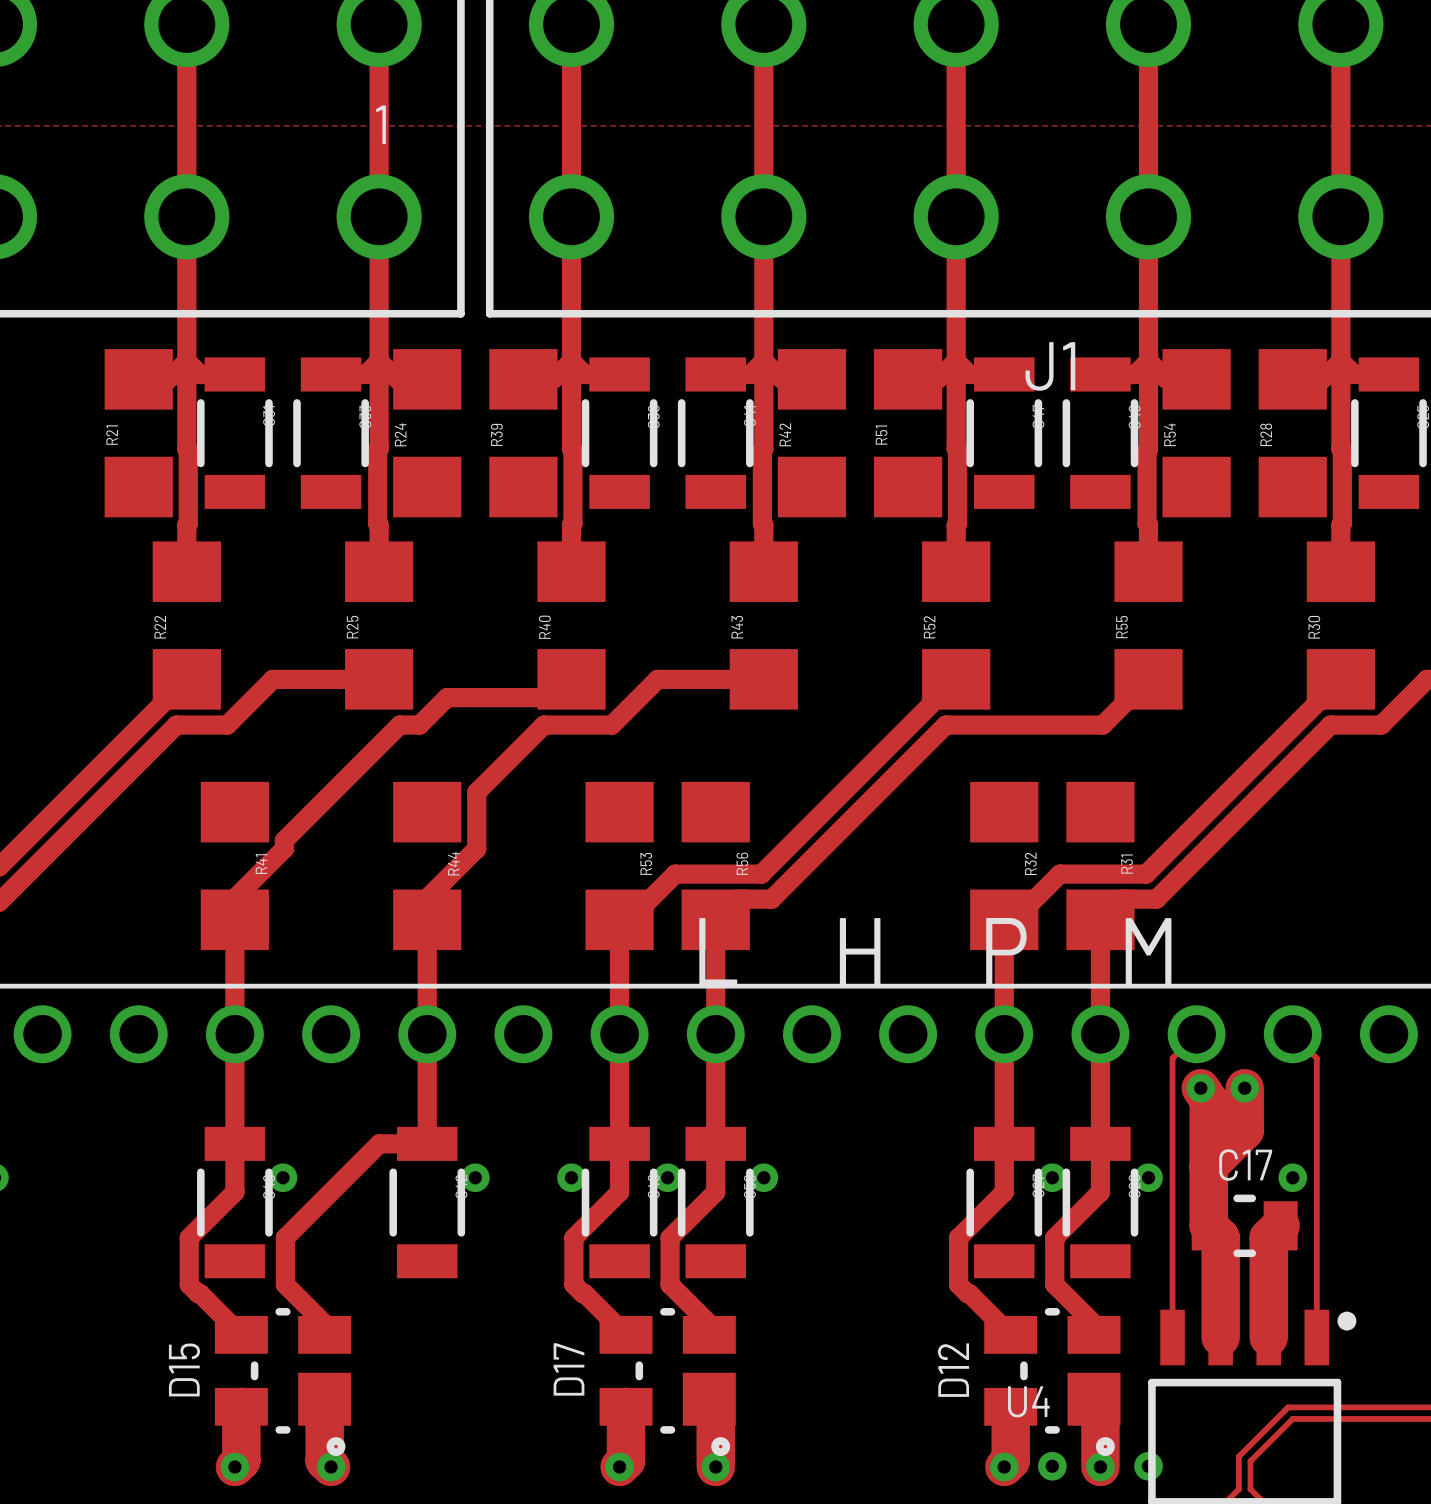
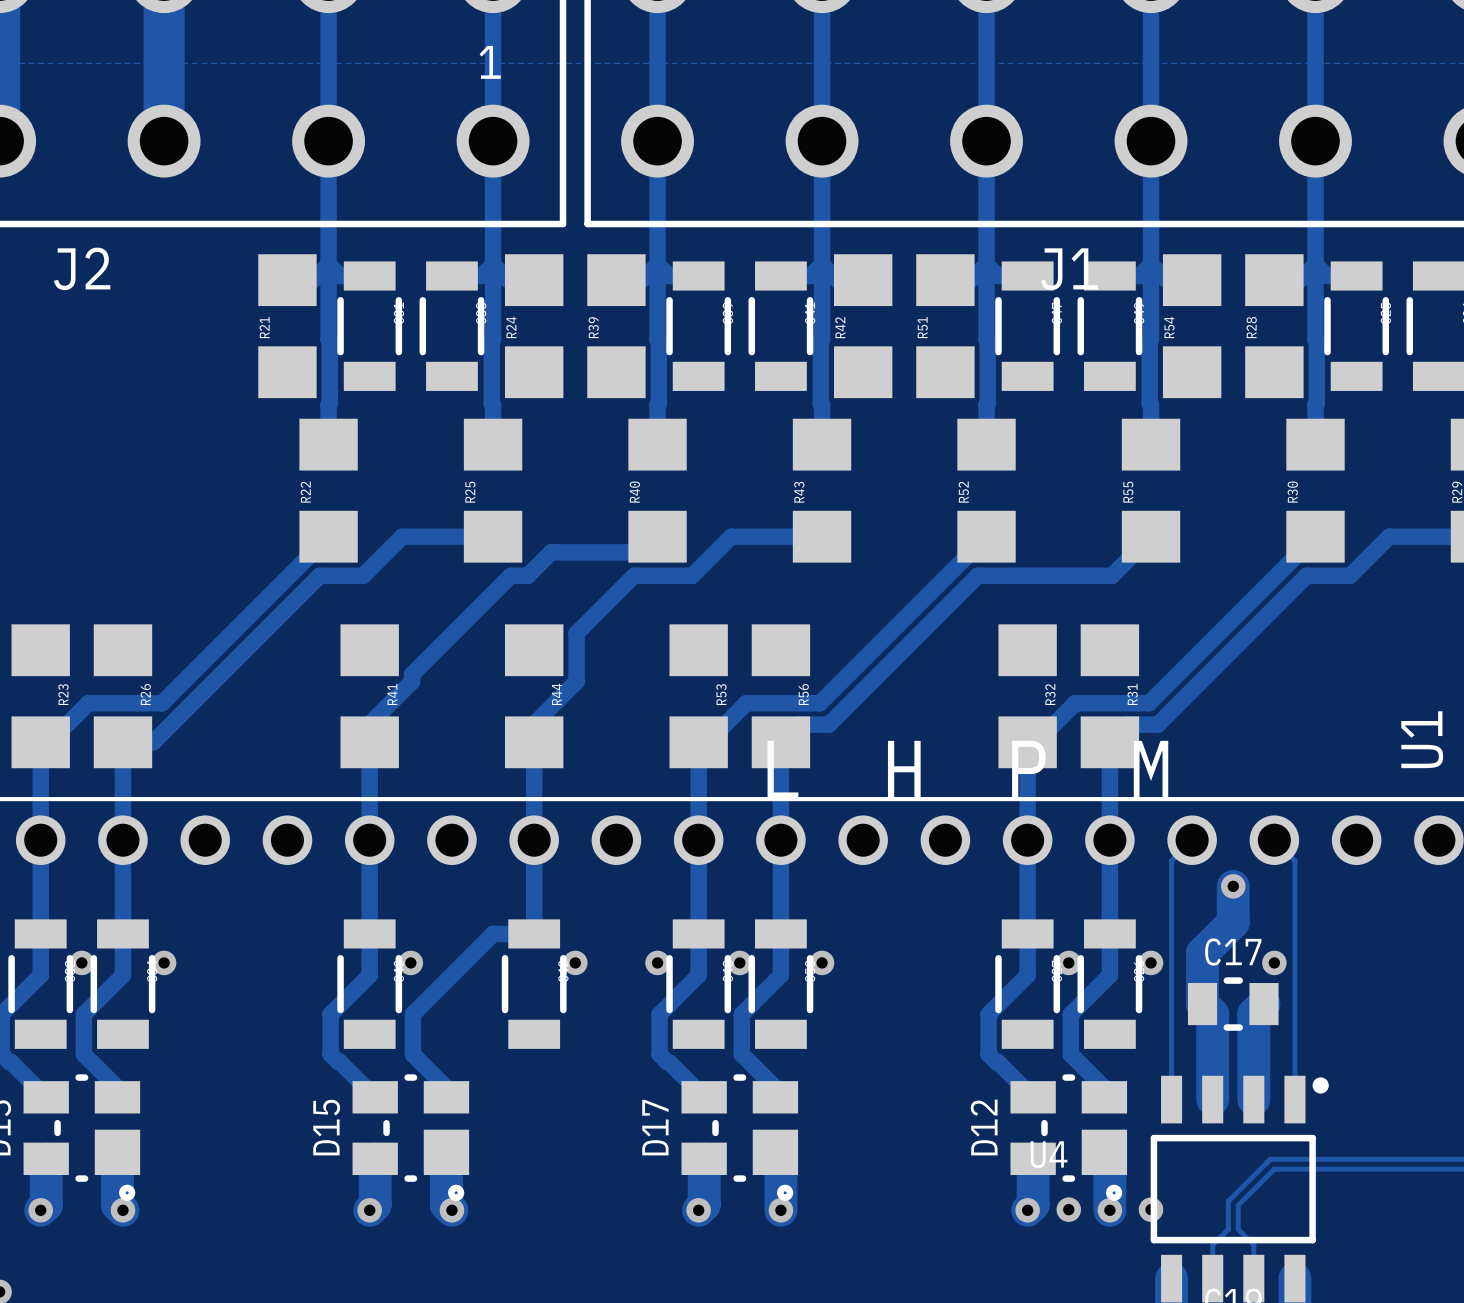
track: (1200, 1088) (1208, 1100) (1208, 1166) -> none
via: (1200, 1088) -> none

